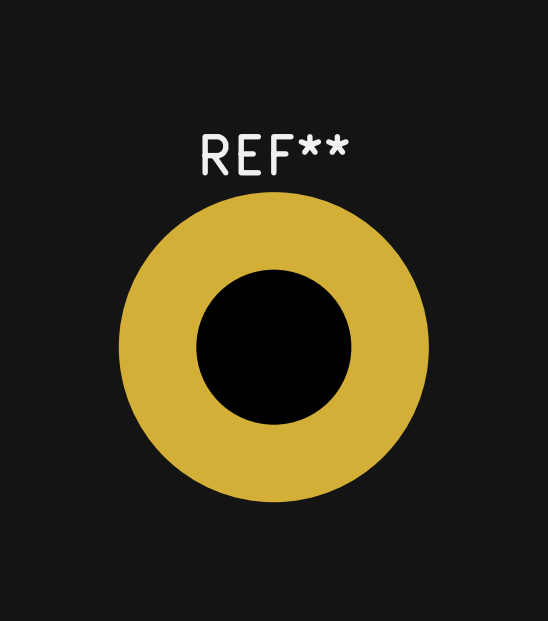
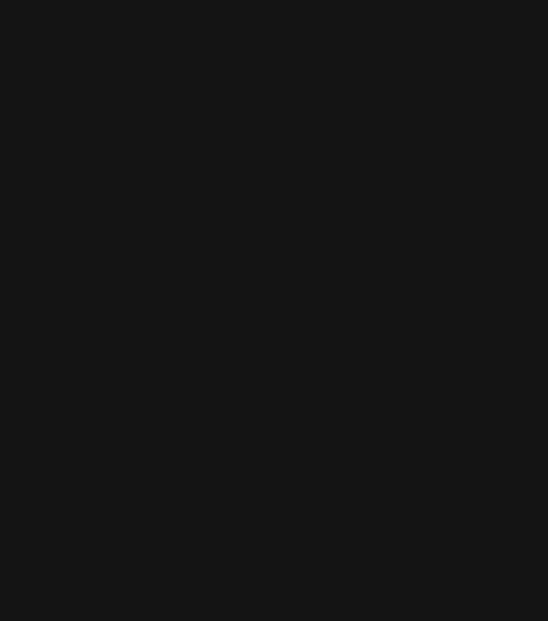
REF**: (273, 347) -> none

